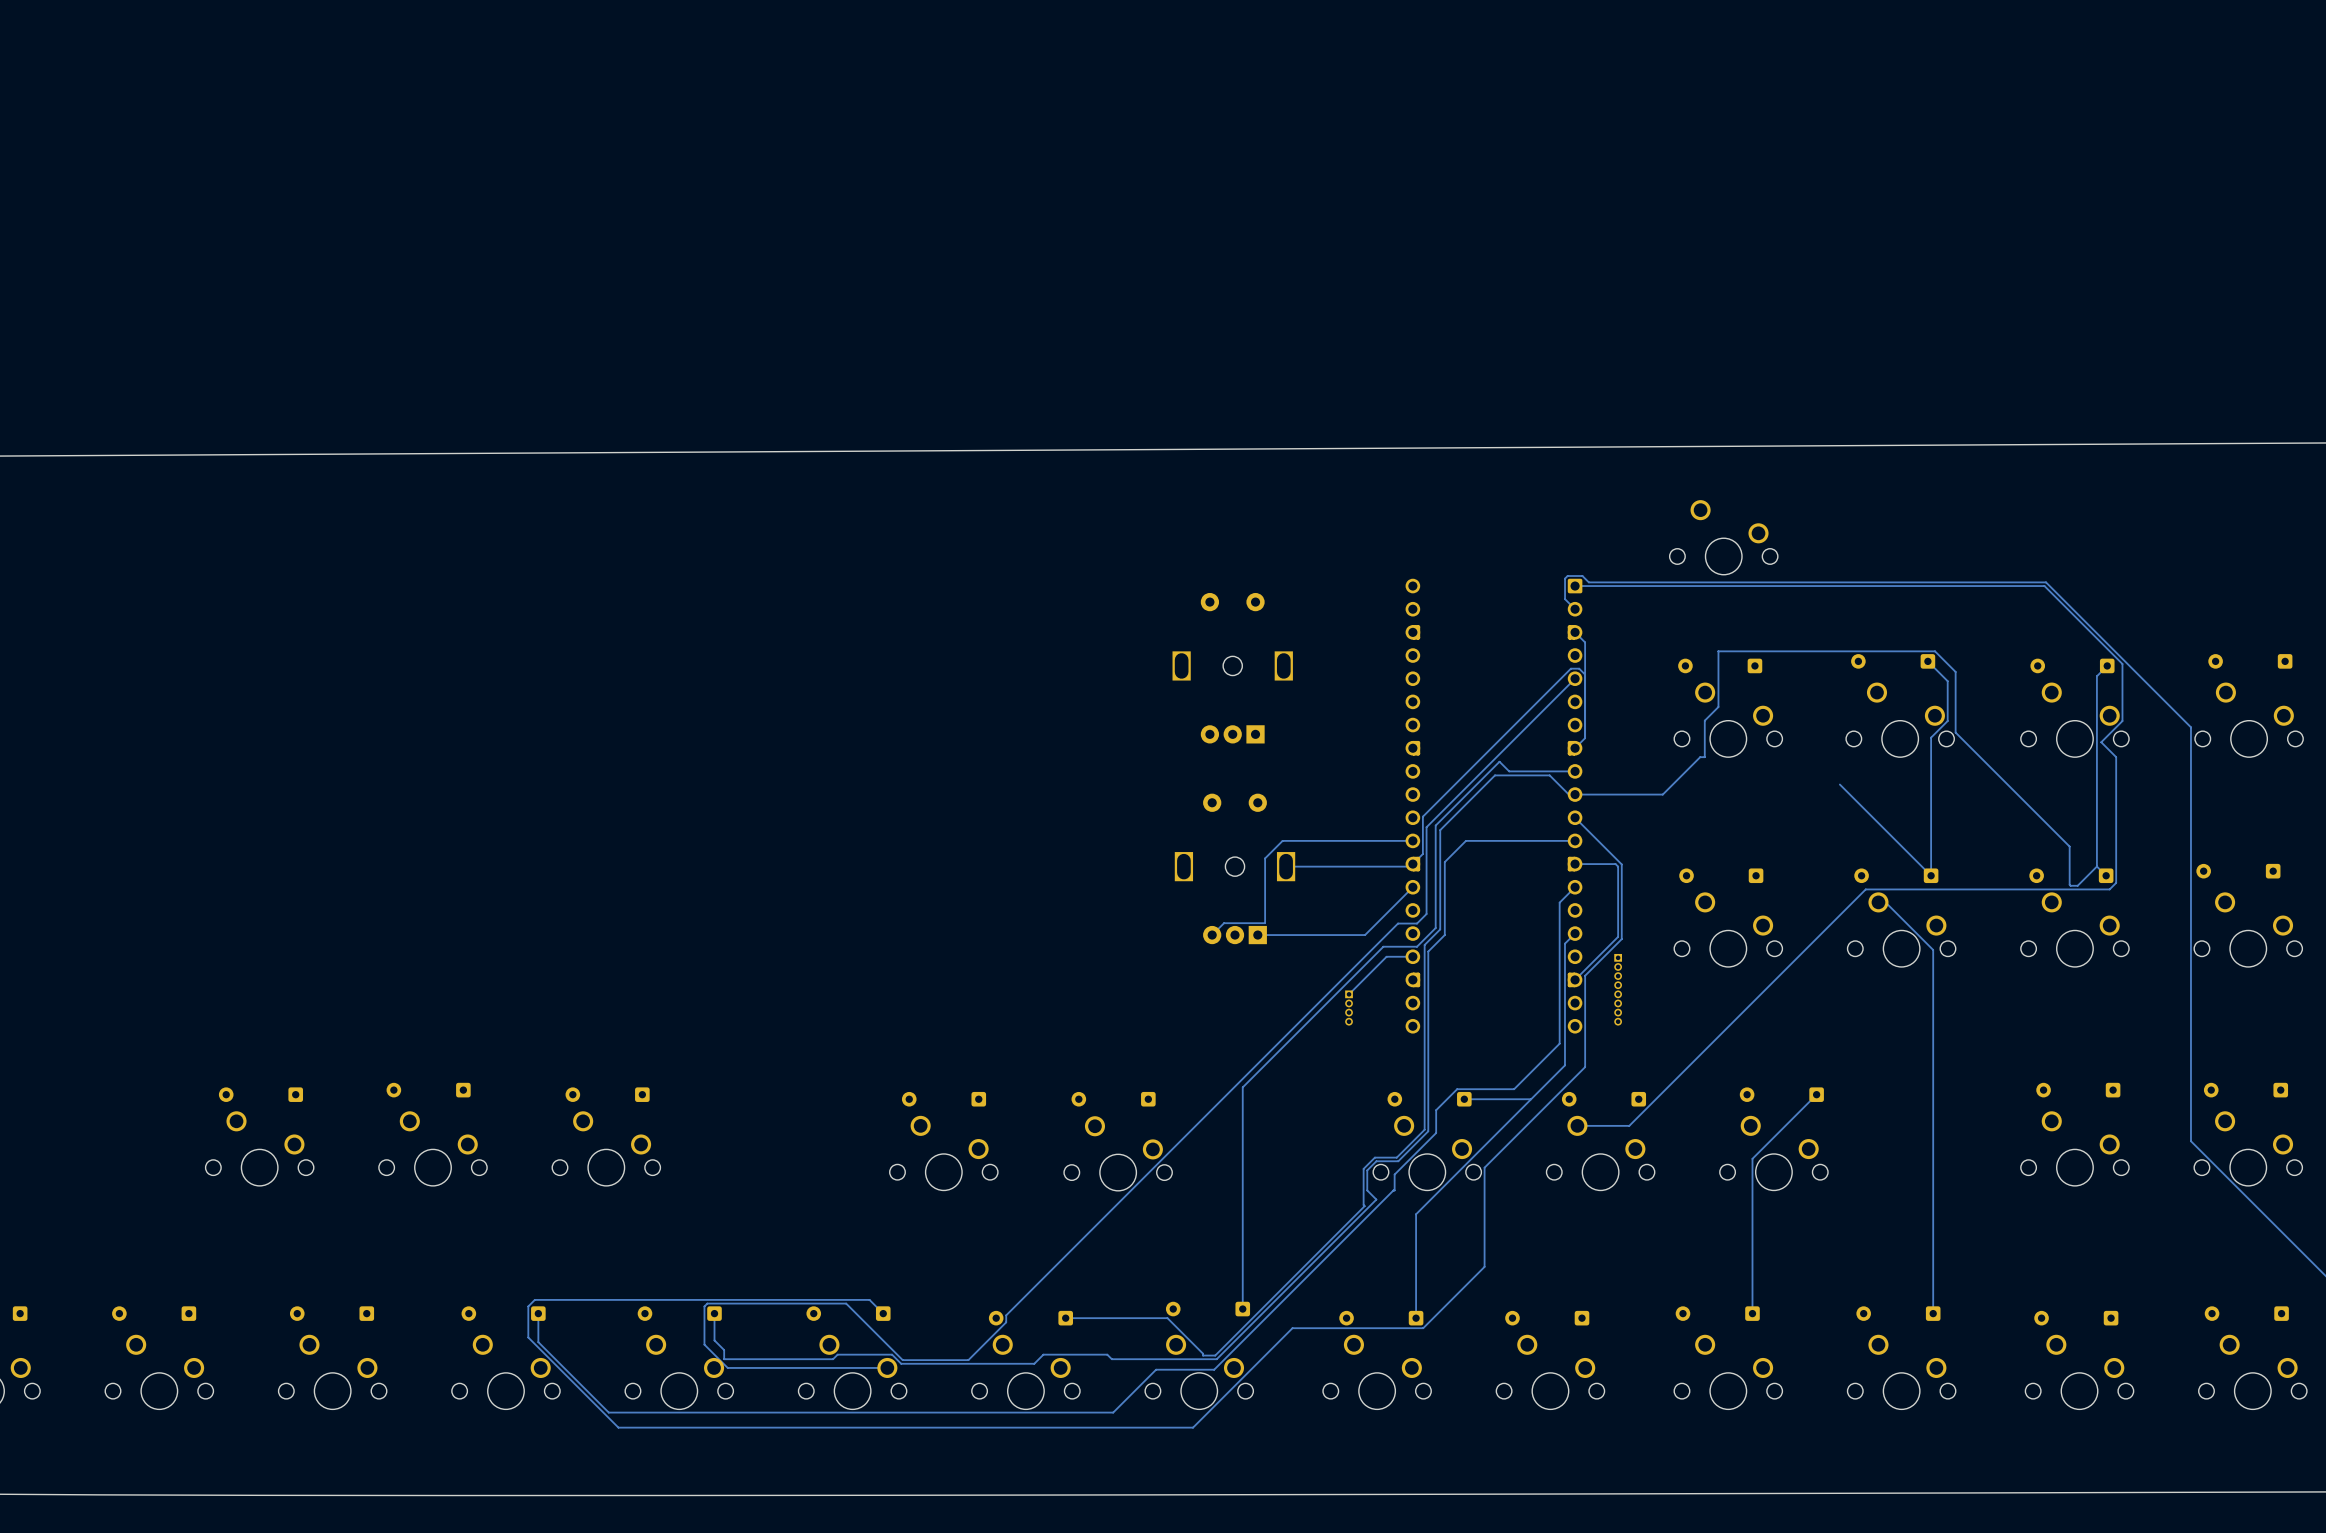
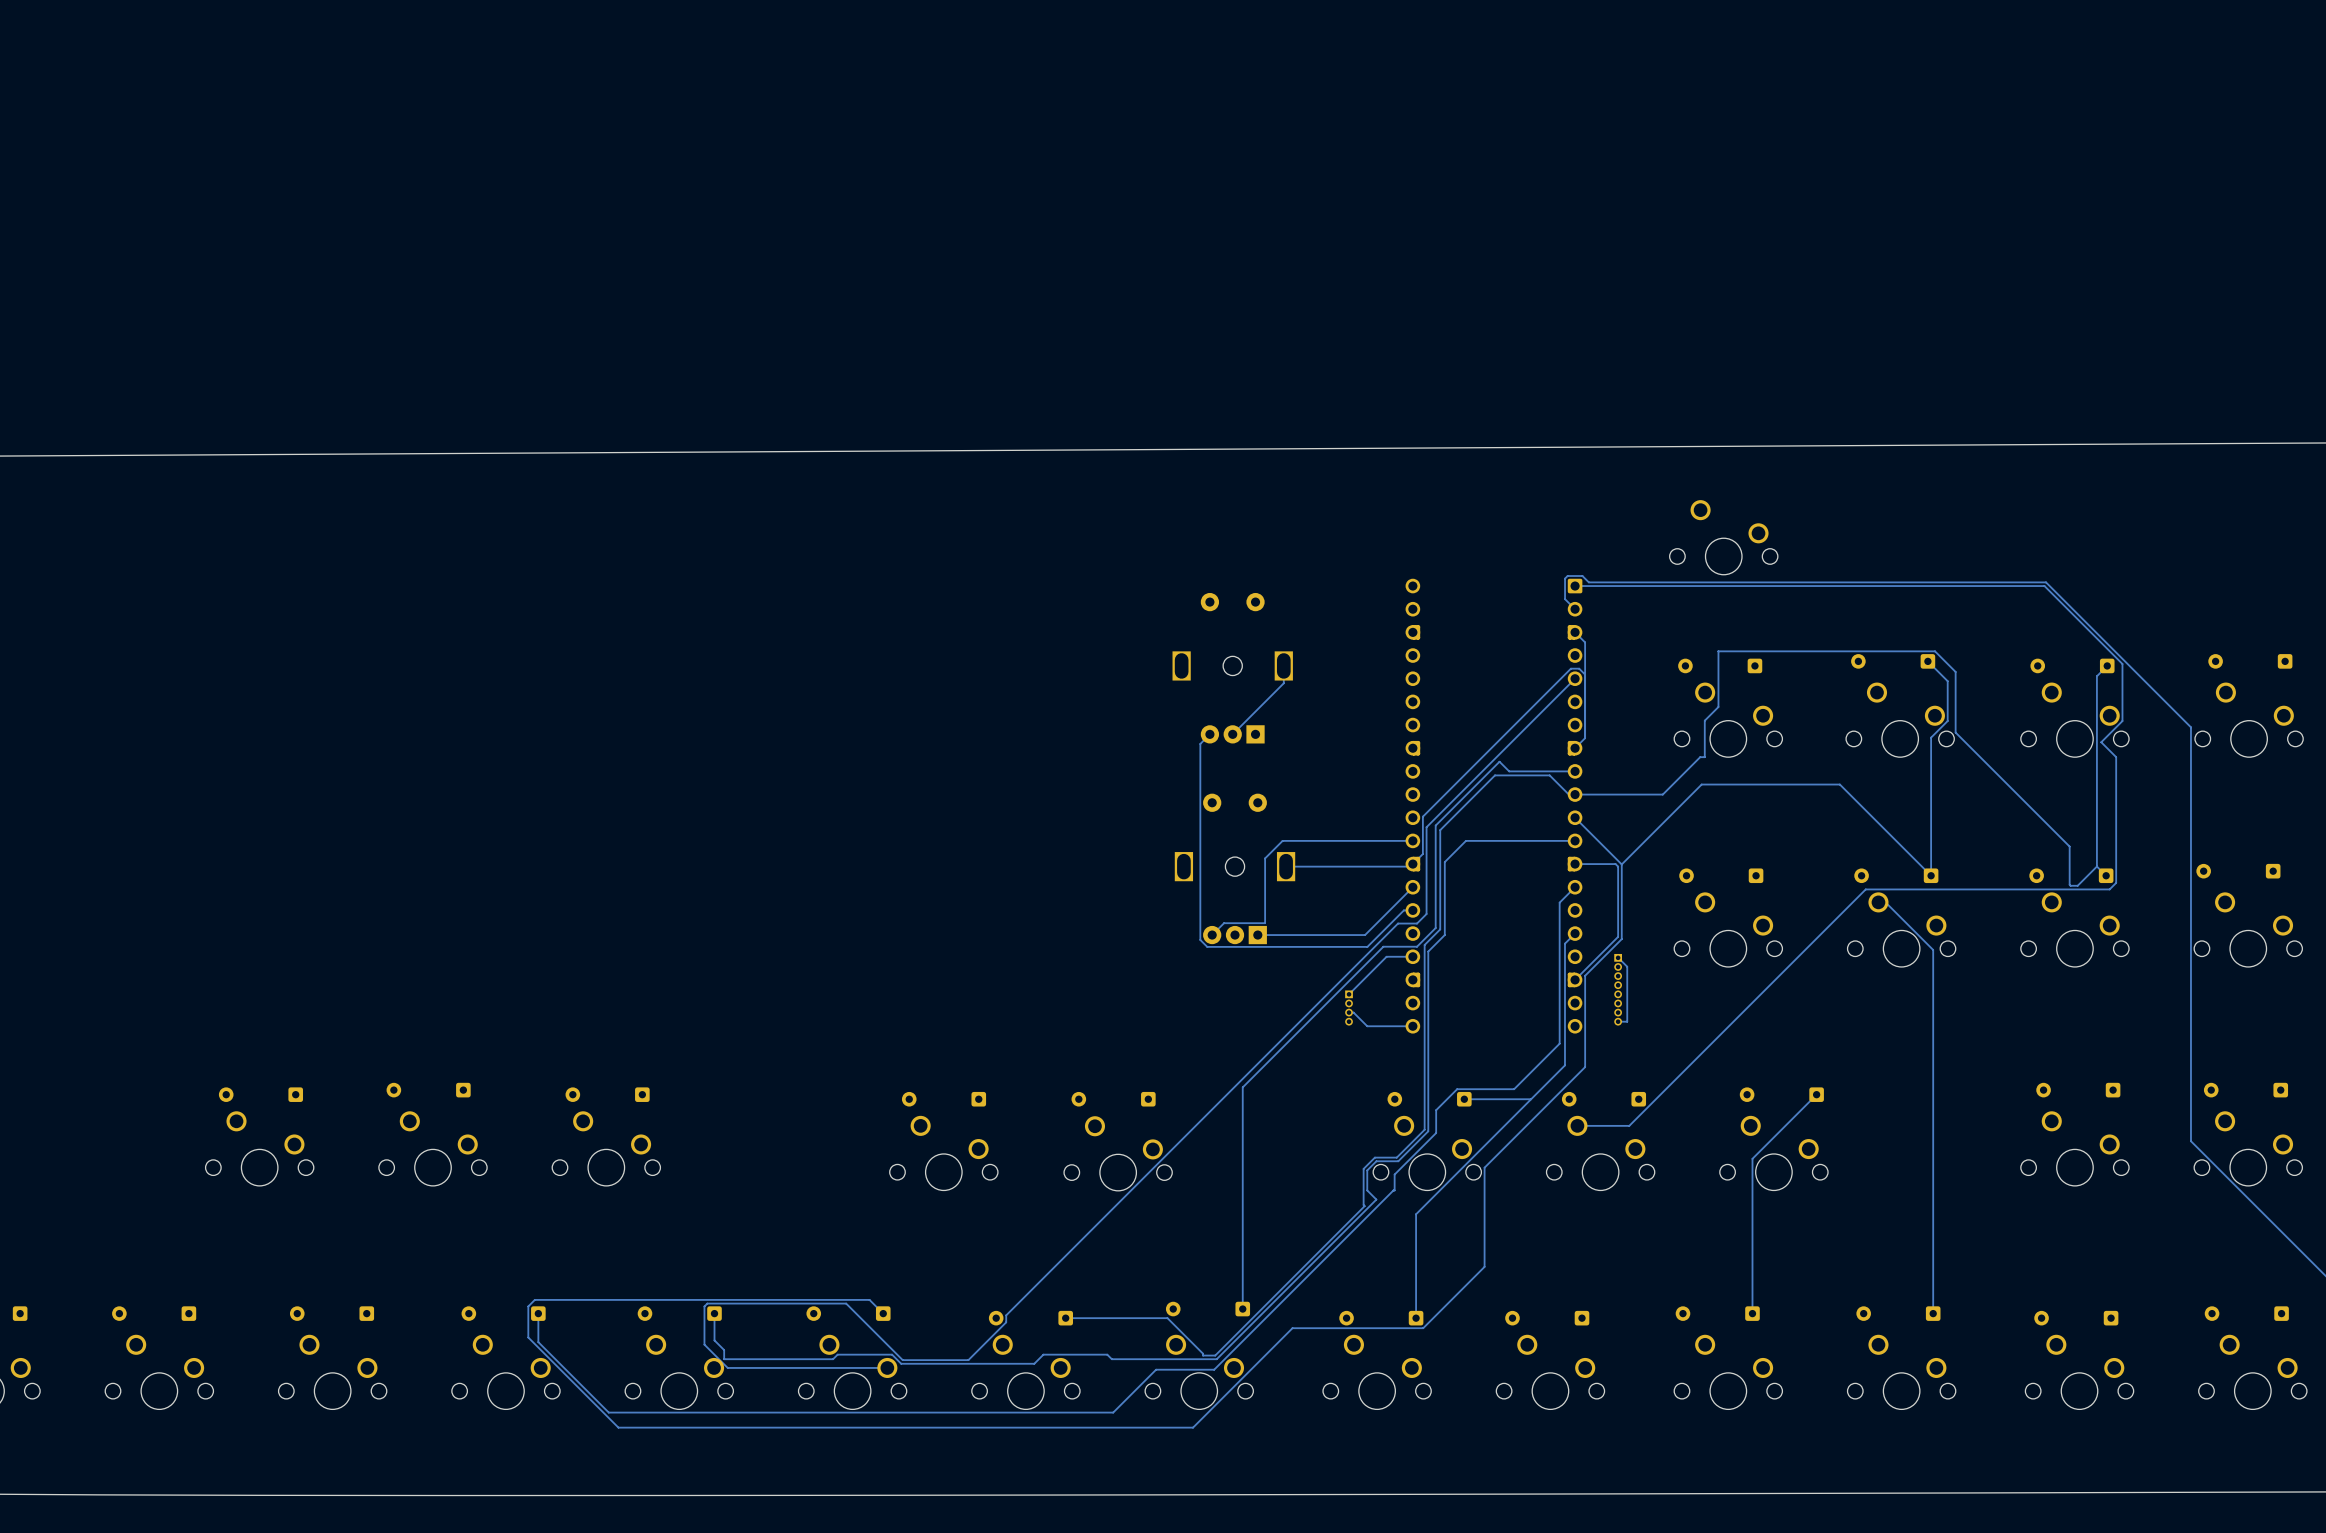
track: none -> (1283, 665) (1283, 683) (1232, 734)
track: none -> (1209, 734) (1200, 743) (1200, 939) (1207, 946) (1367, 946) (1403, 910) (1412, 910)
track: none -> (1839, 784) (1701, 784) (1621, 864)
track: none -> (1618, 957) (1627, 966) (1627, 1021) (1618, 1021)
track: none -> (1349, 1012) (1353, 1012) (1367, 1026) (1412, 1026)

